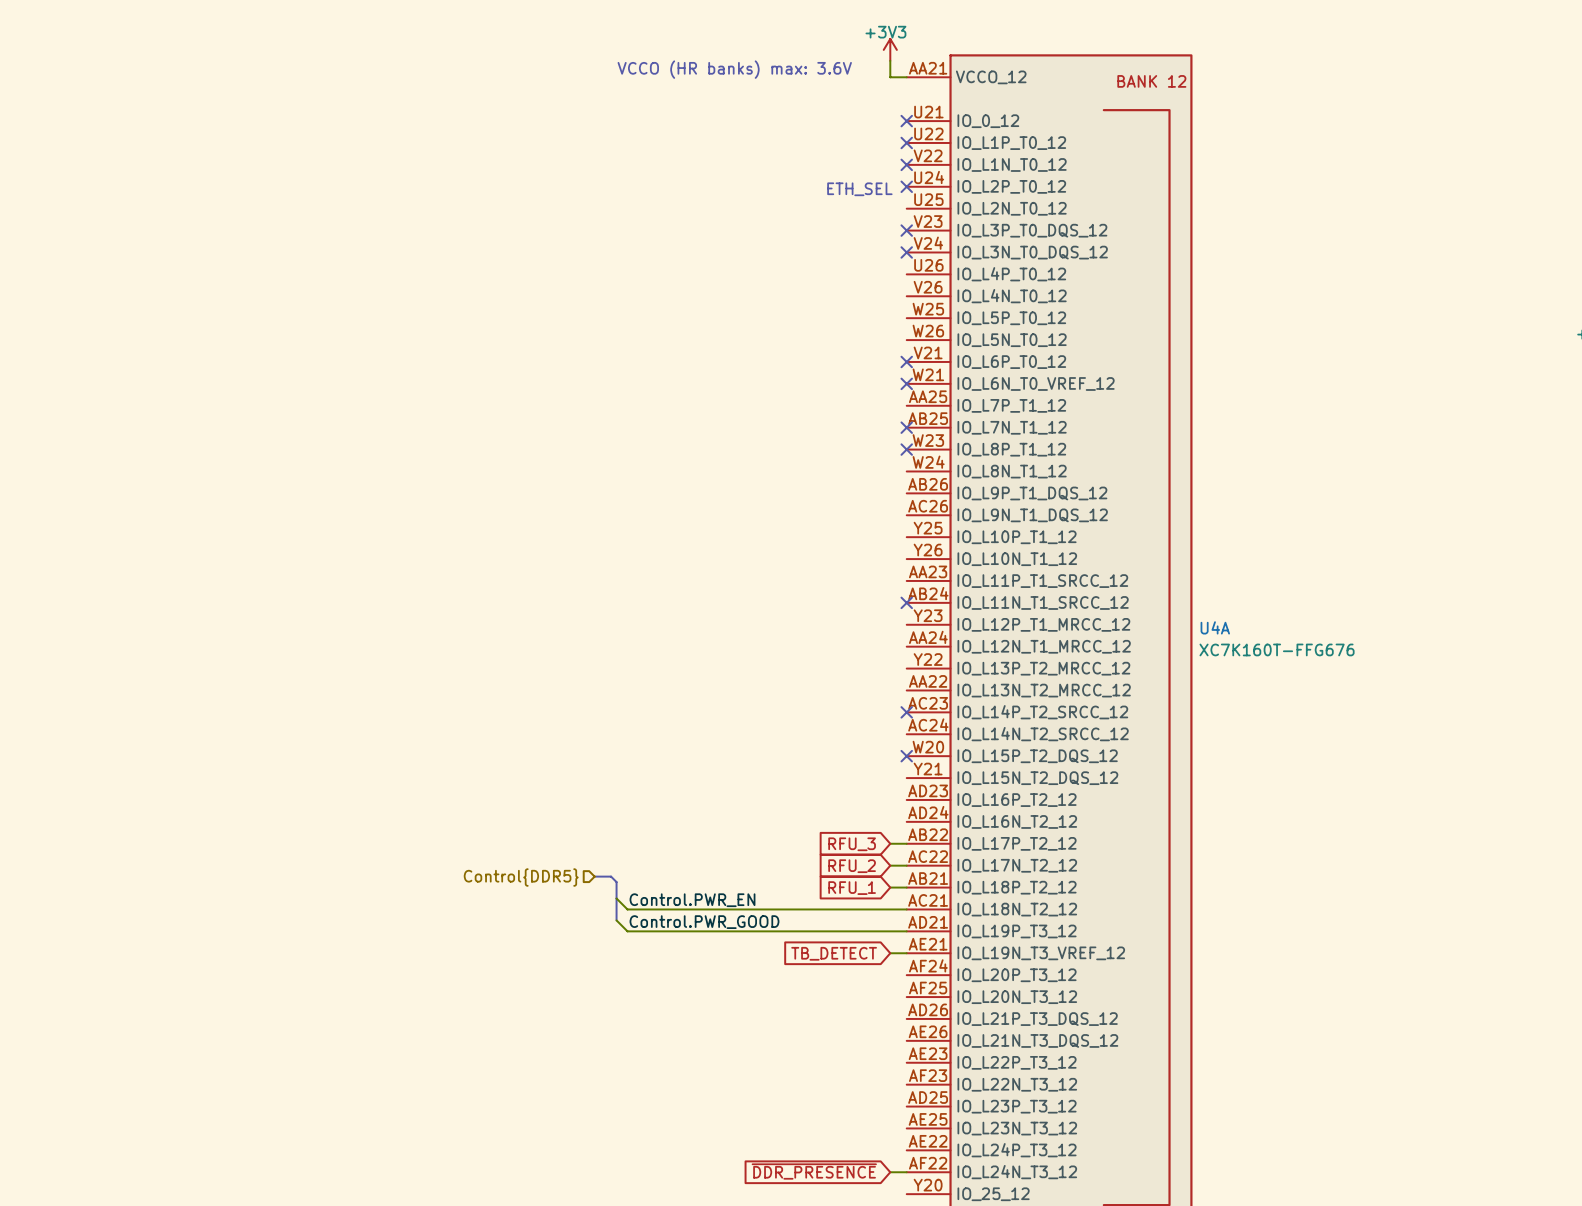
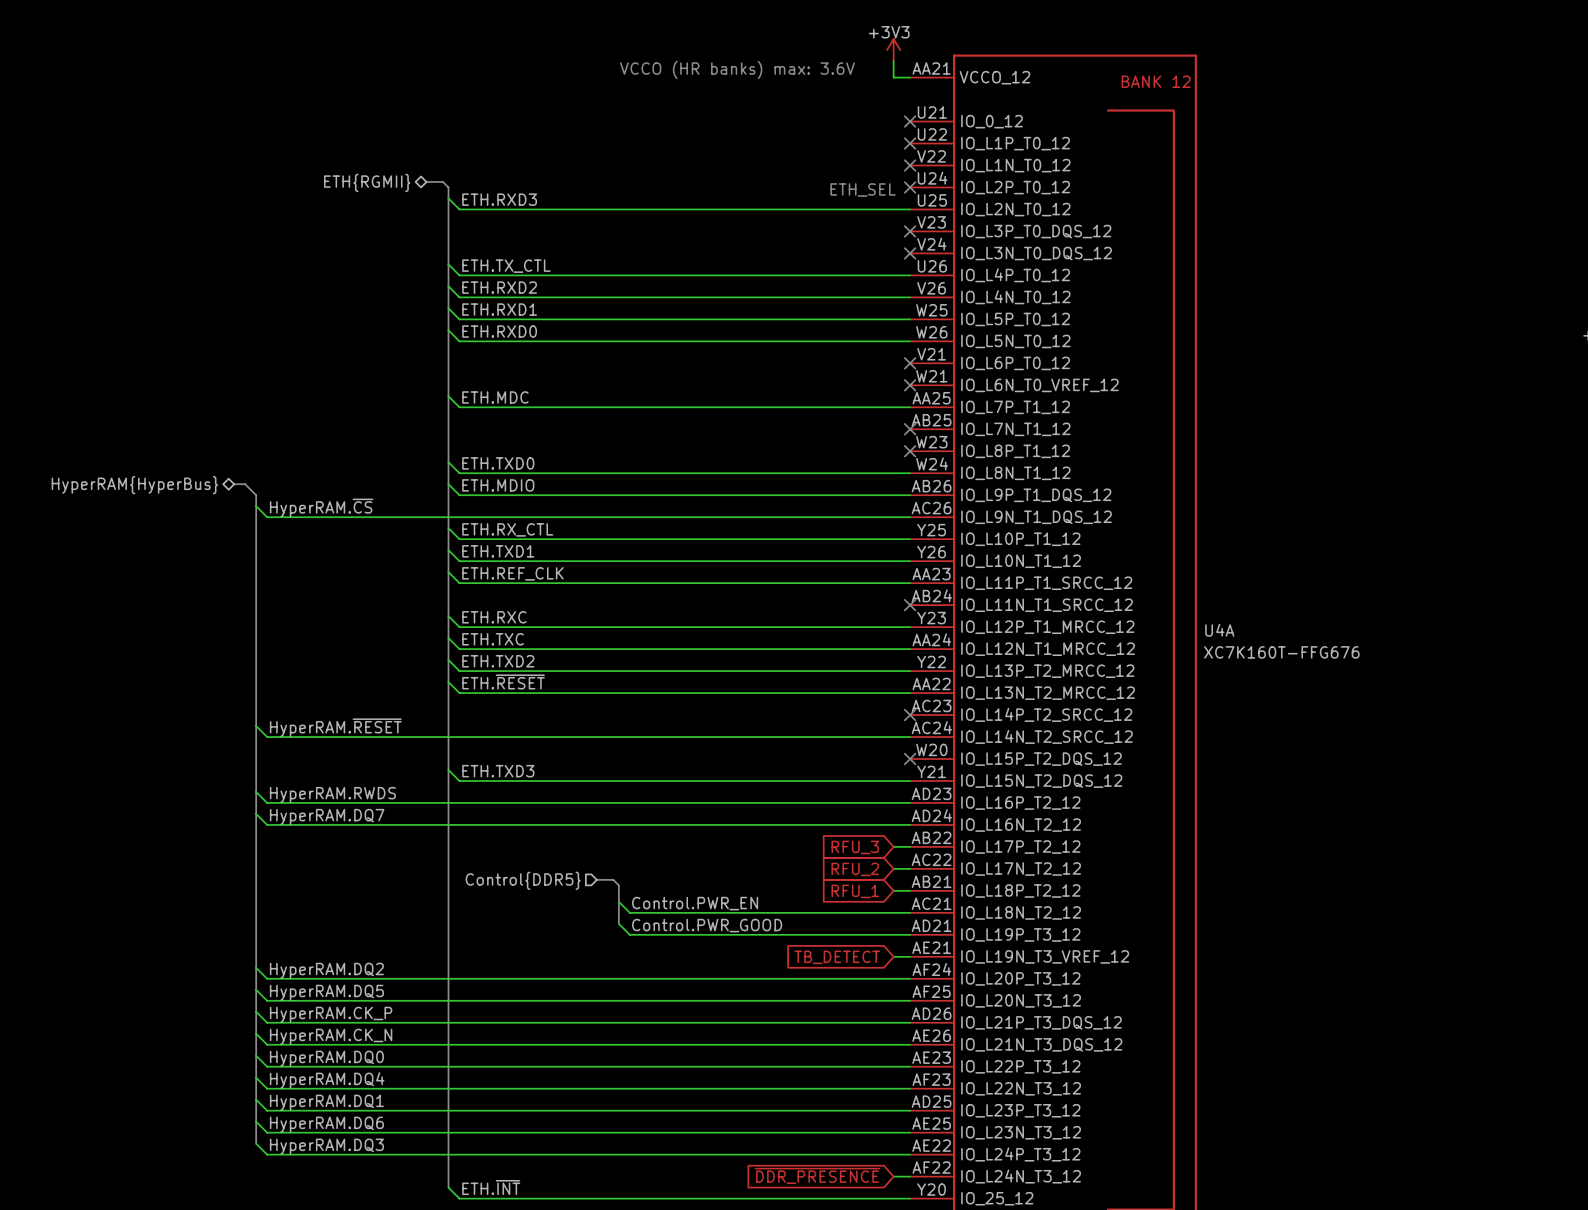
bus: none -> (426, 181) (443, 181) (448, 187) (448, 1187)
hierarchical label: none -> ETH{RGMII} (367, 182)
wire: none -> (448, 198) (459, 209) (910, 209)
label: none -> ETH.RXD3 (499, 199)
wire: none -> (448, 264) (459, 275) (910, 275)
label: none -> ETH.TX_CTL (506, 266)
wire: none -> (448, 286) (459, 297) (910, 297)
label: none -> ETH.RXD2 (499, 287)
wire: none -> (448, 308) (459, 319) (910, 319)
label: none -> ETH.RXD1 (499, 309)
wire: none -> (448, 330) (459, 341) (910, 341)
label: none -> ETH.RXD0 (499, 331)
wire: none -> (448, 396) (459, 407) (910, 407)
label: none -> ETH.MDC (495, 397)
wire: none -> (448, 462) (459, 473) (910, 473)
label: none -> ETH.TXD0 (498, 463)
bus: none -> (234, 484) (245, 484) (256, 495) (256, 1143)
wire: none -> (448, 484) (459, 495) (910, 495)
hierarchical label: none -> HyperRAM{HyperBus} (134, 485)
label: none -> ETH.MDIO (498, 485)
wire: none -> (256, 506) (267, 517) (910, 517)
label: none -> HyperRAM.~{CS} (321, 507)
wire: none -> (448, 528) (459, 539) (910, 539)
label: none -> ETH.RX_CTL (507, 529)
wire: none -> (448, 550) (459, 561) (910, 561)
label: none -> ETH.TXD1 (498, 551)
wire: none -> (448, 572) (459, 583) (910, 583)
label: none -> ETH.REF_CLK (512, 573)
wire: none -> (448, 616) (459, 627) (910, 627)
label: none -> ETH.RXC (494, 617)
wire: none -> (448, 638) (459, 649) (910, 649)
label: none -> ETH.TXC (493, 639)
wire: none -> (448, 660) (459, 671) (910, 671)
label: none -> ETH.TXD2 (498, 661)
wire: none -> (448, 682) (459, 693) (910, 693)
label: none -> ETH.~{RESET} (503, 681)
wire: none -> (256, 726) (267, 737) (910, 737)
label: none -> HyperRAM.~{RESET} (335, 727)
wire: none -> (448, 769) (459, 780) (910, 780)
label: none -> ETH.TXD3 (498, 771)
wire: none -> (256, 791) (267, 802) (910, 802)
label: none -> HyperRAM.RWDS (332, 794)
wire: none -> (256, 813) (267, 824) (910, 824)
label: none -> HyperRAM.DQ7 (327, 816)
wire: none -> (256, 967) (267, 978) (910, 978)
label: none -> HyperRAM.DQ2 (326, 970)
wire: none -> (256, 989) (267, 1000) (910, 1000)
label: none -> HyperRAM.DQ5 (326, 992)
wire: none -> (256, 1011) (267, 1022) (910, 1022)
label: none -> HyperRAM.CK_P (331, 1014)
wire: none -> (256, 1033) (267, 1044) (910, 1044)
label: none -> HyperRAM.CK_N (331, 1036)
wire: none -> (256, 1055) (267, 1066) (910, 1066)
label: none -> HyperRAM.DQ0 (326, 1058)
wire: none -> (256, 1077) (267, 1088) (910, 1088)
label: none -> HyperRAM.DQ4 (327, 1080)
wire: none -> (256, 1099) (267, 1110) (910, 1110)
label: none -> HyperRAM.DQ1 (326, 1102)
wire: none -> (256, 1121) (267, 1132) (910, 1132)
label: none -> HyperRAM.DQ6 (326, 1124)
wire: none -> (256, 1143) (267, 1154) (910, 1154)
label: none -> HyperRAM.DQ3 (326, 1146)
wire: none -> (448, 1187) (459, 1198) (910, 1198)
label: none -> ETH.~{INT} (491, 1187)

